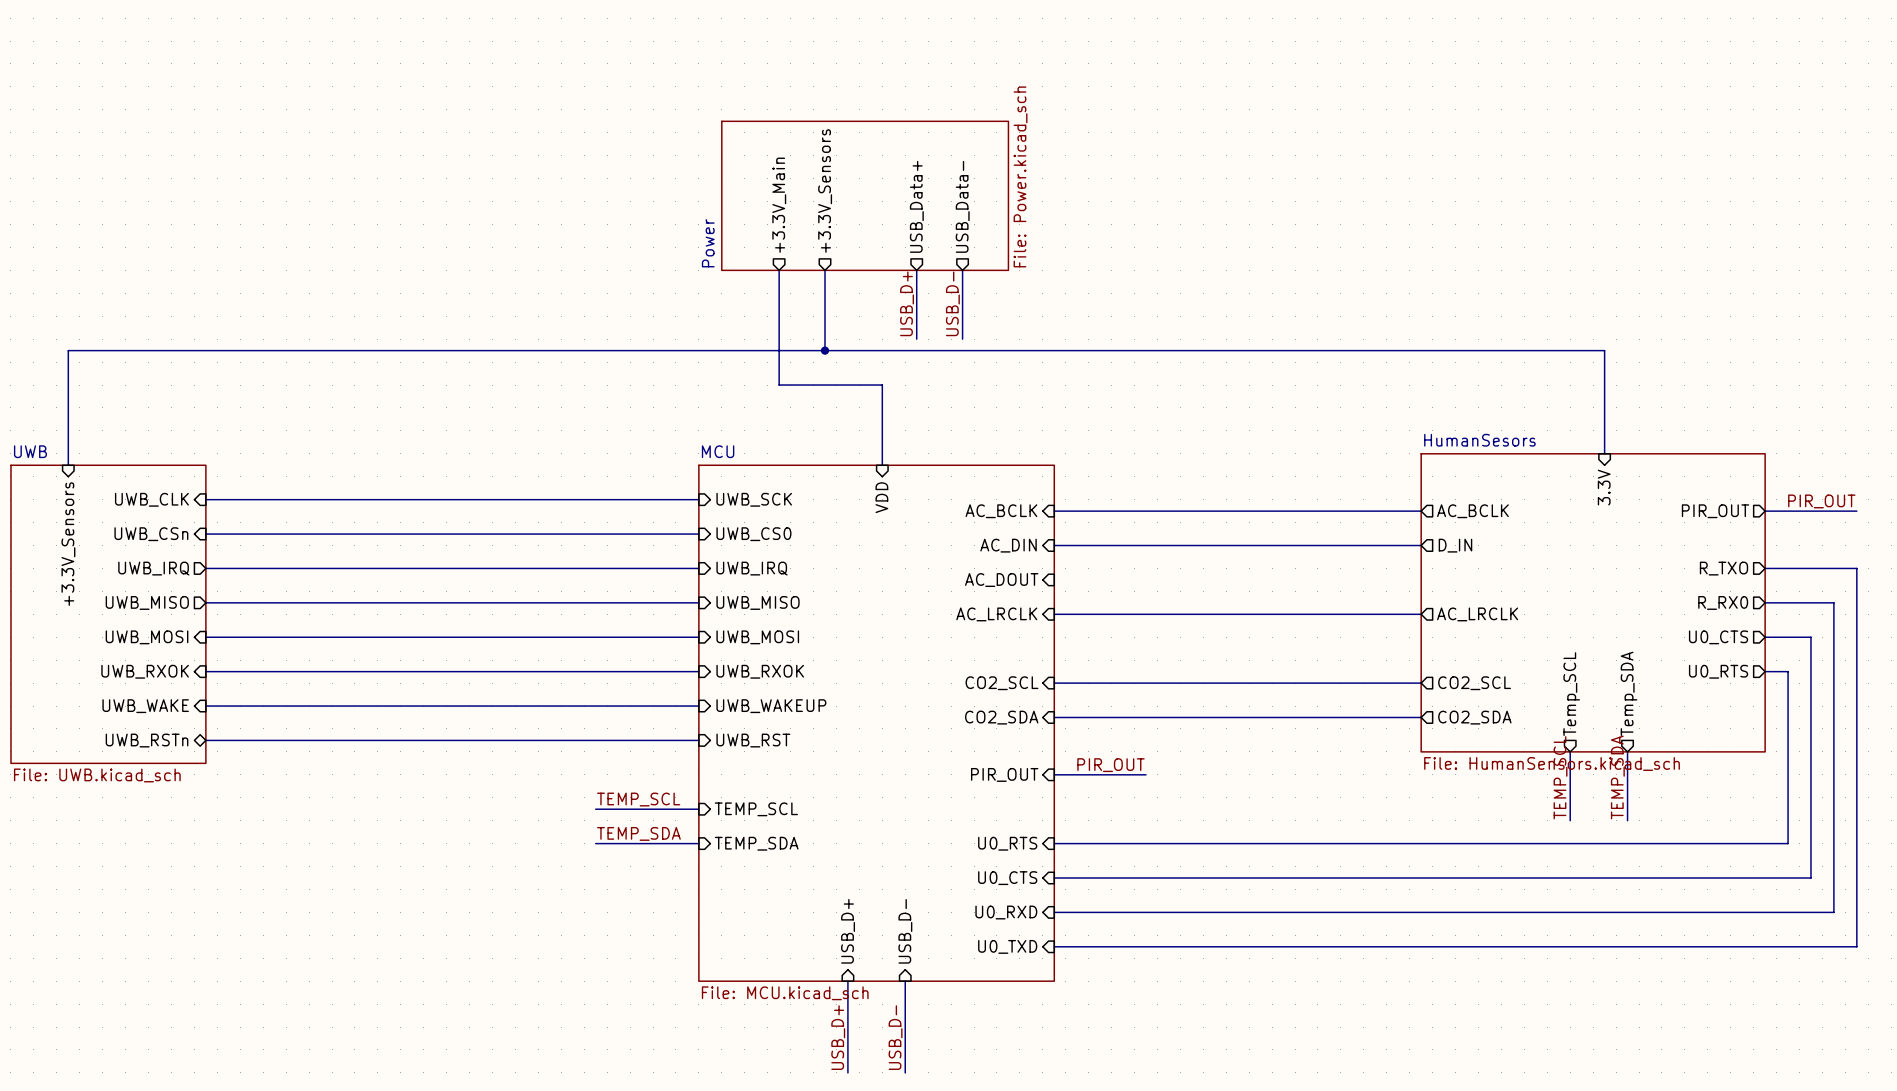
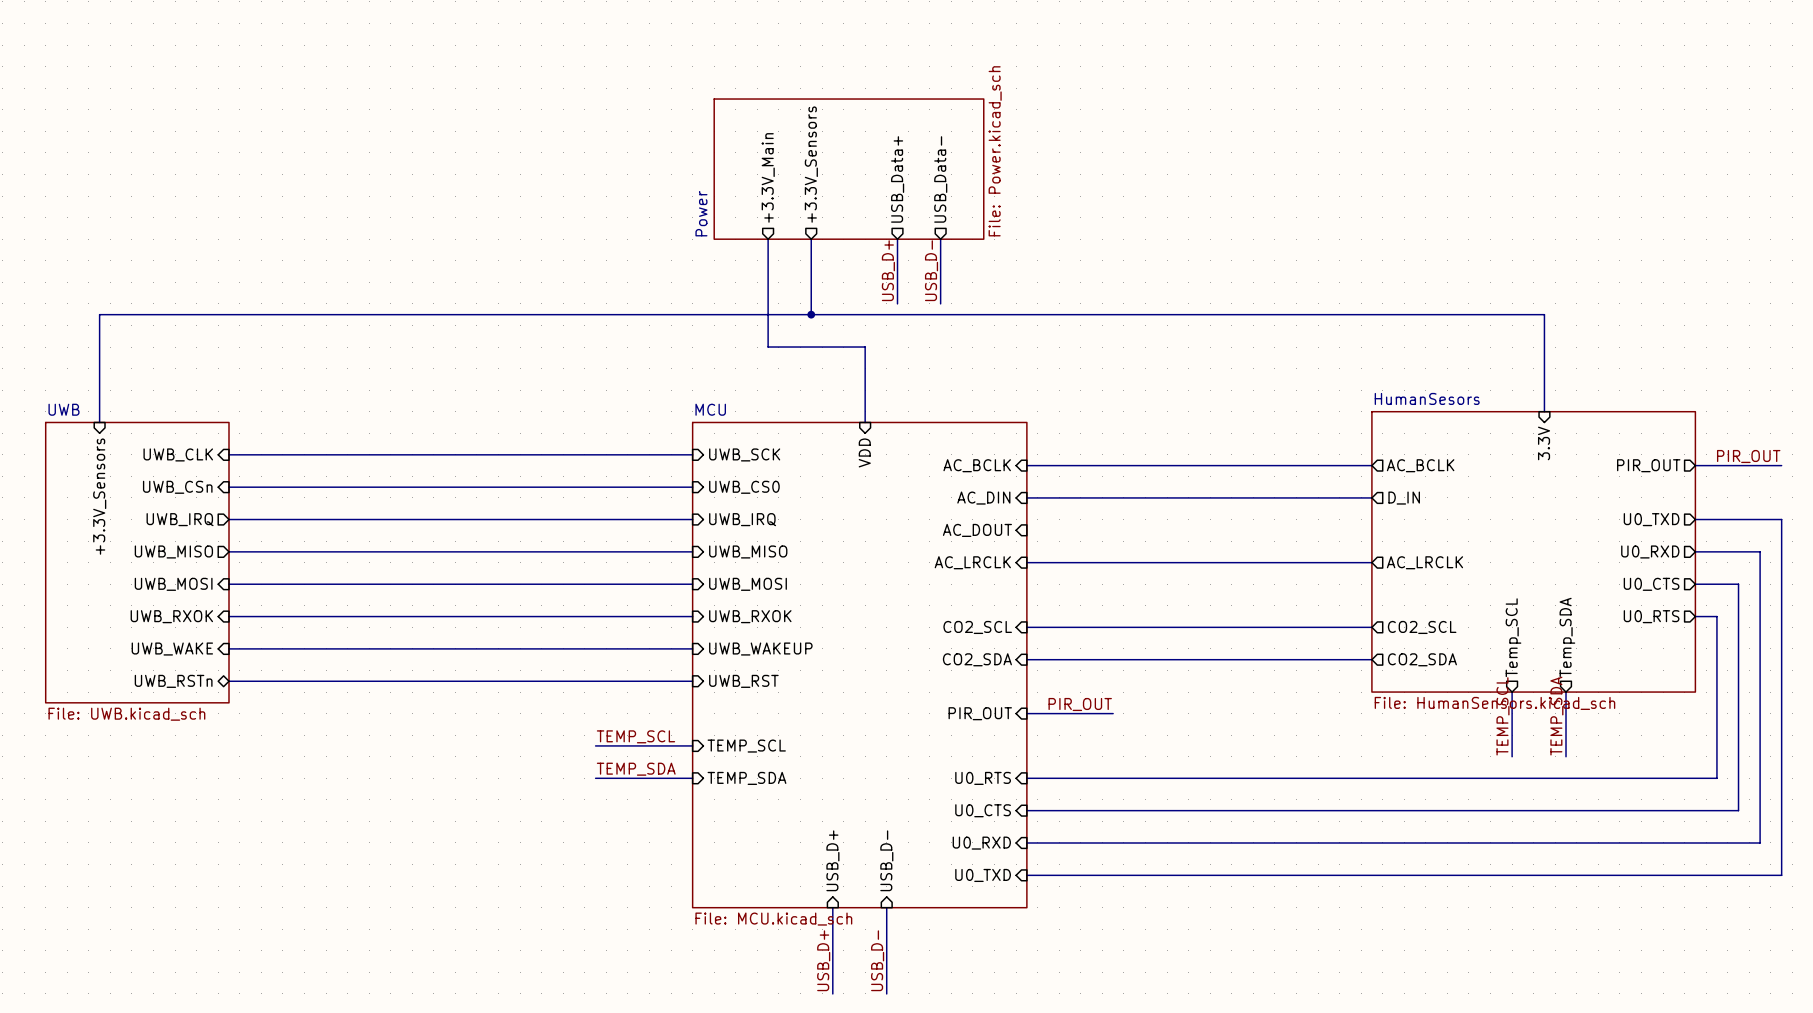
sheet pin: R_TXO (1723, 568) -> U0_TXD (1651, 519)
sheet pin: R_RX0 (1723, 602) -> U0_RXD (1650, 551)

